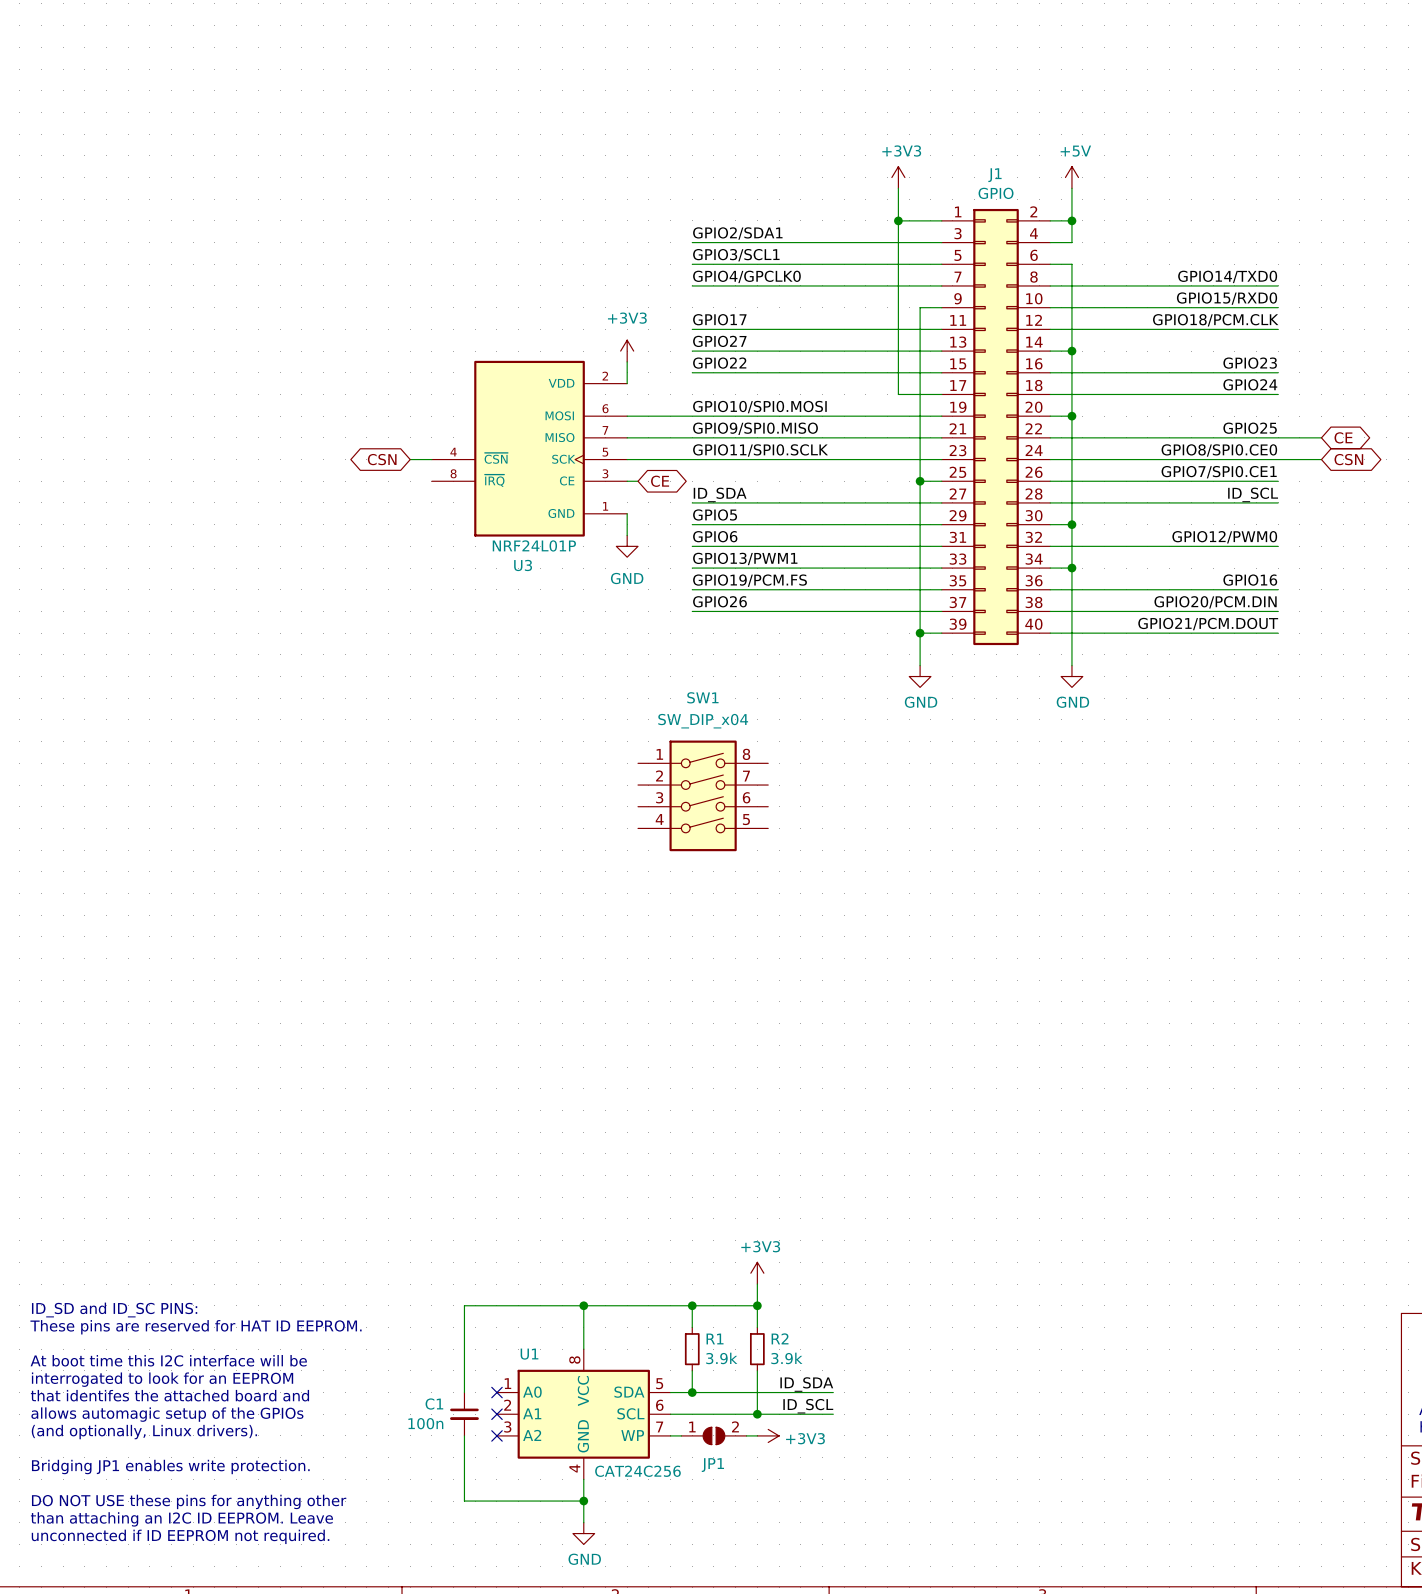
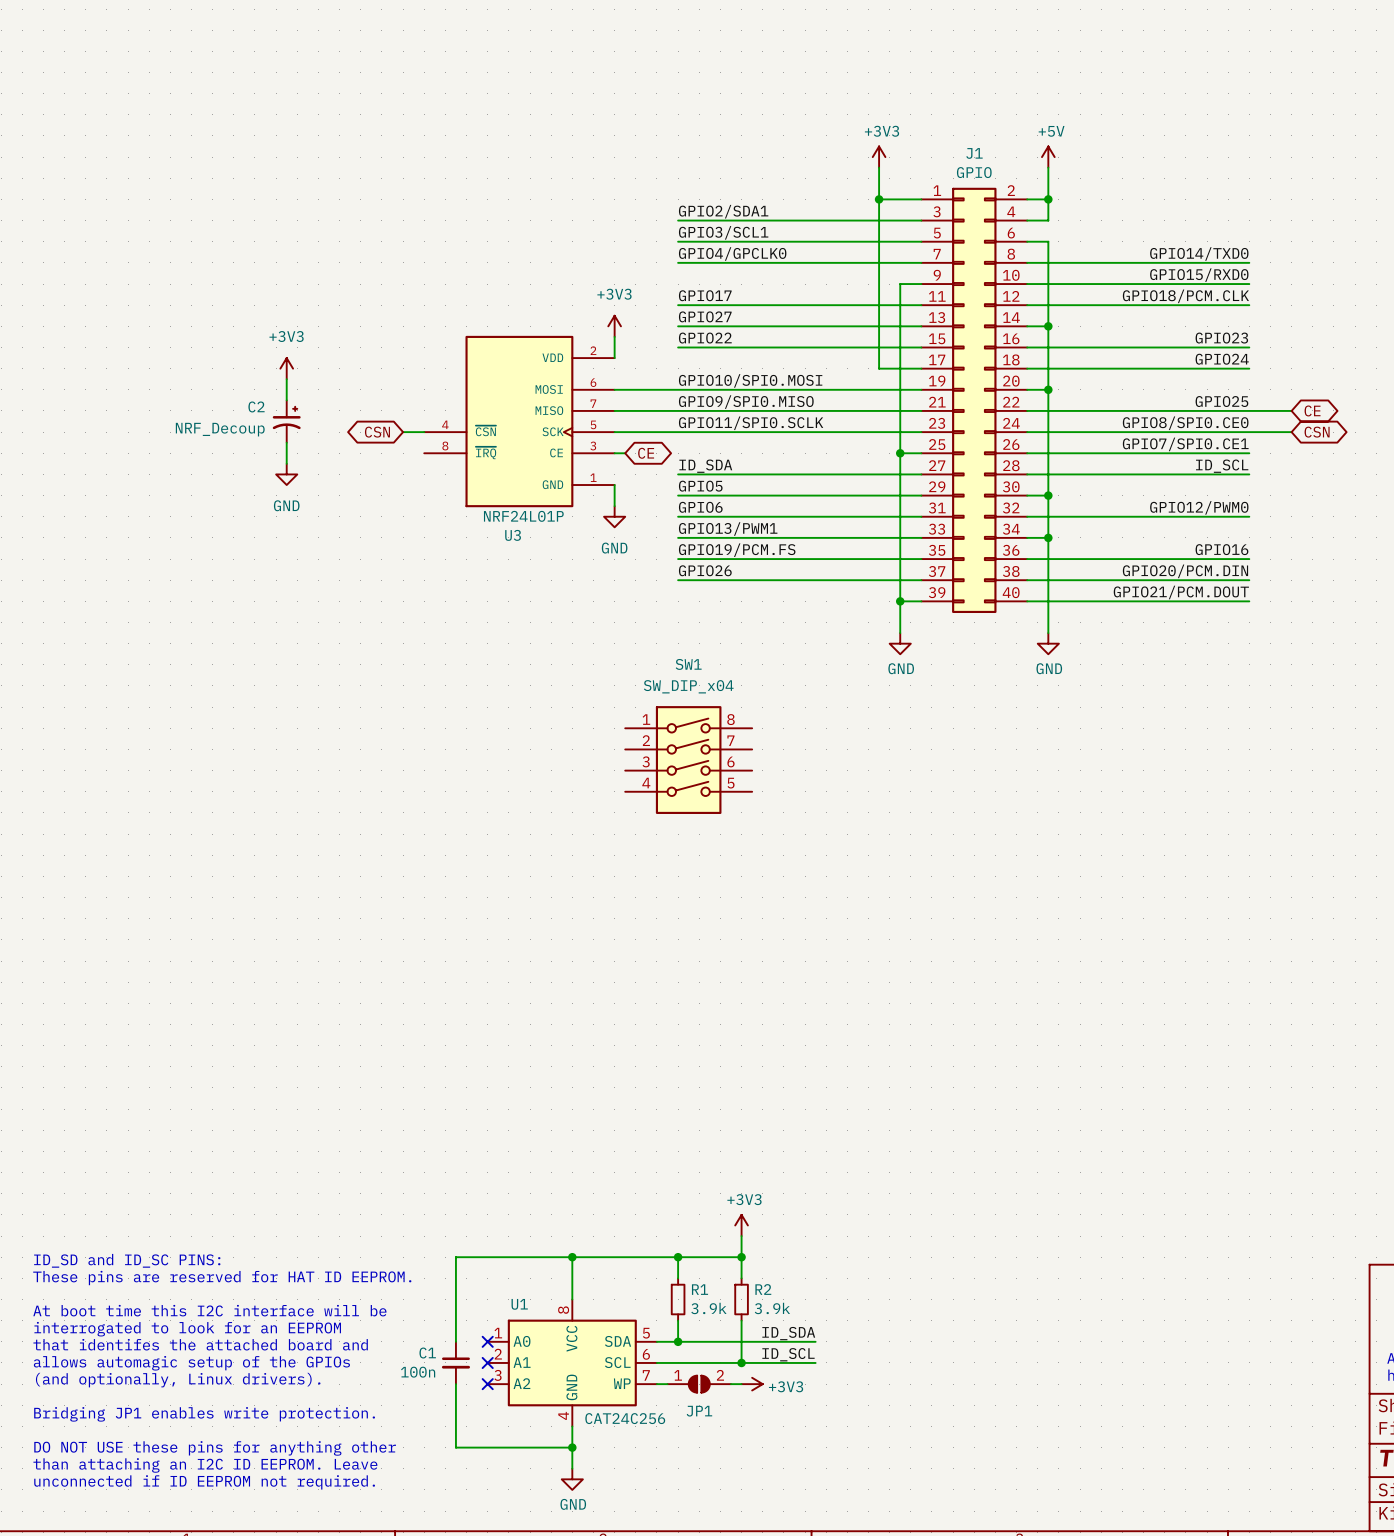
power symbol: none -> +3V3 (286, 368)
wire: none -> (286, 379) (286, 400)
C2: none -> NRF_Decoup (286, 421)
wire: none -> (286, 442) (286, 463)
power symbol: none -> GND (286, 474)

